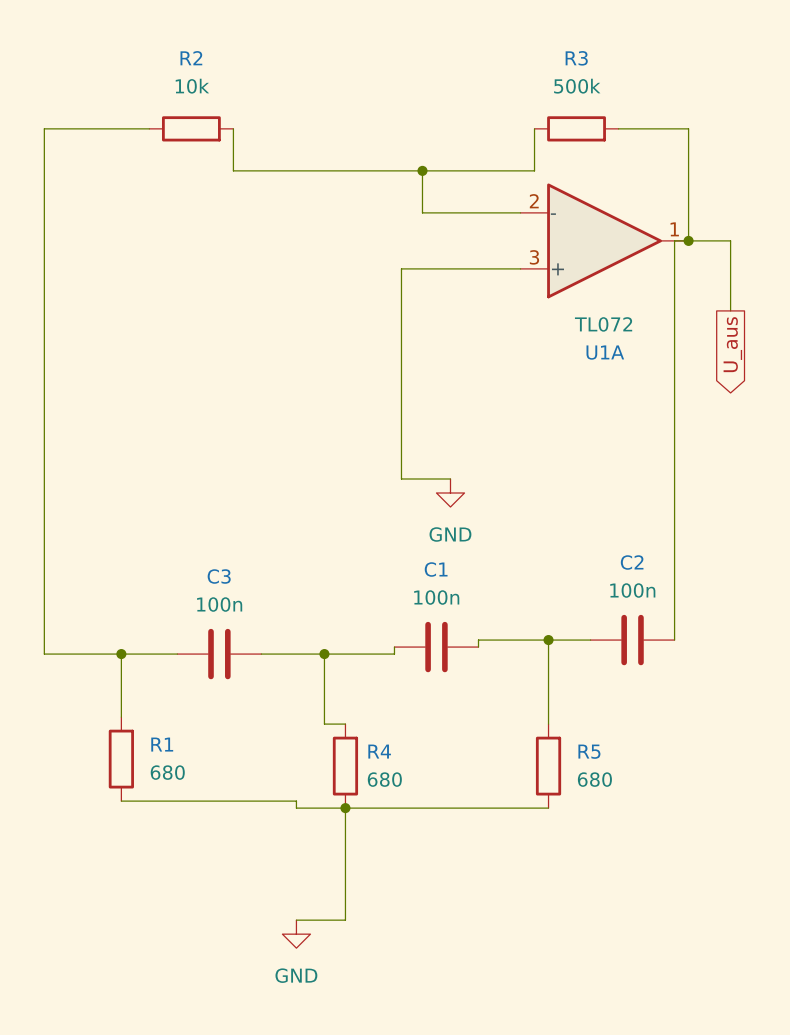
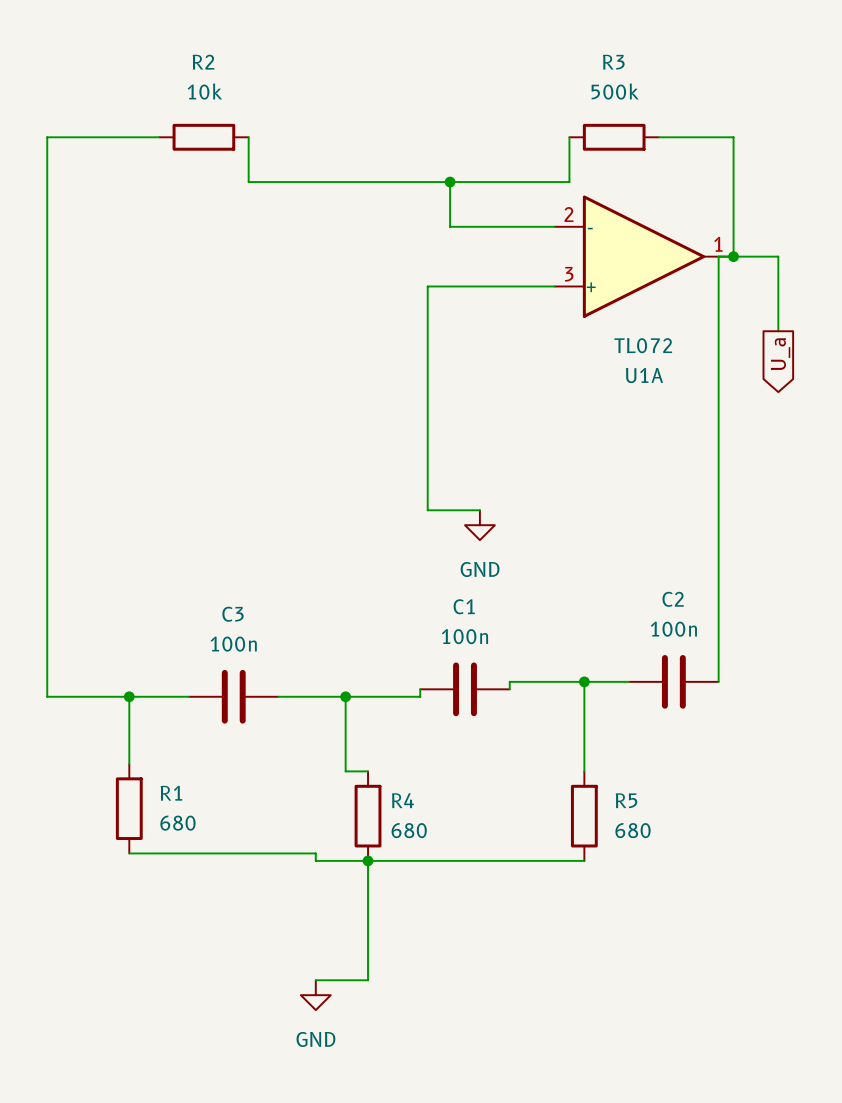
global label: U_aus (732, 344) -> U_a (780, 354)

